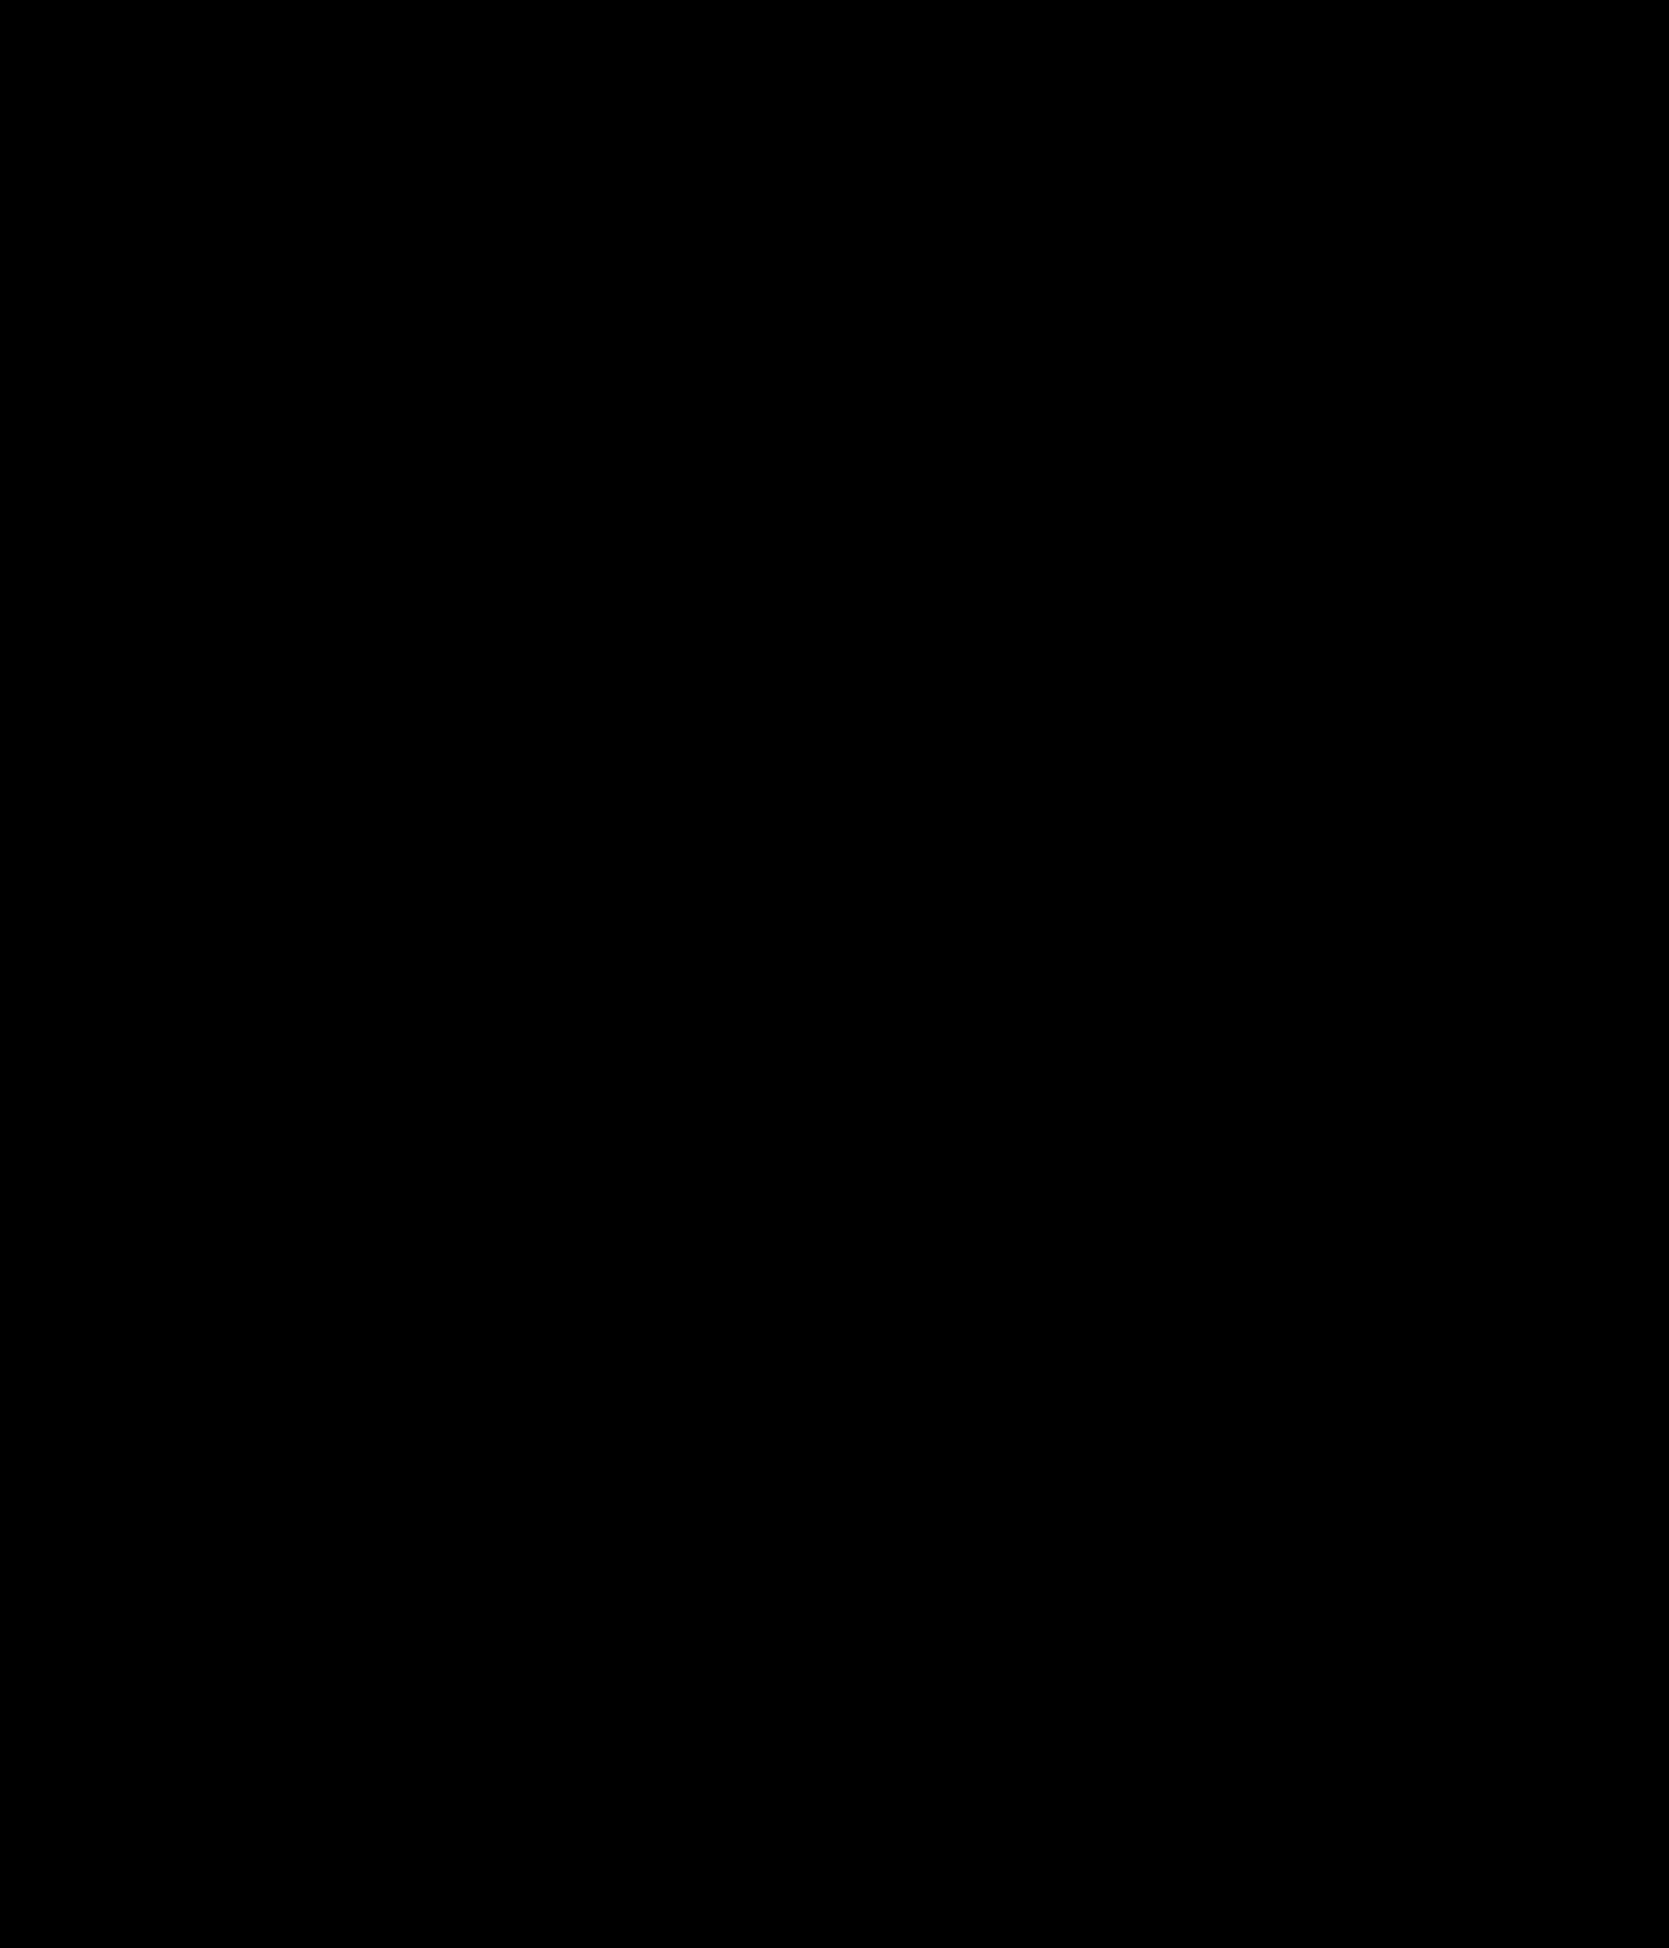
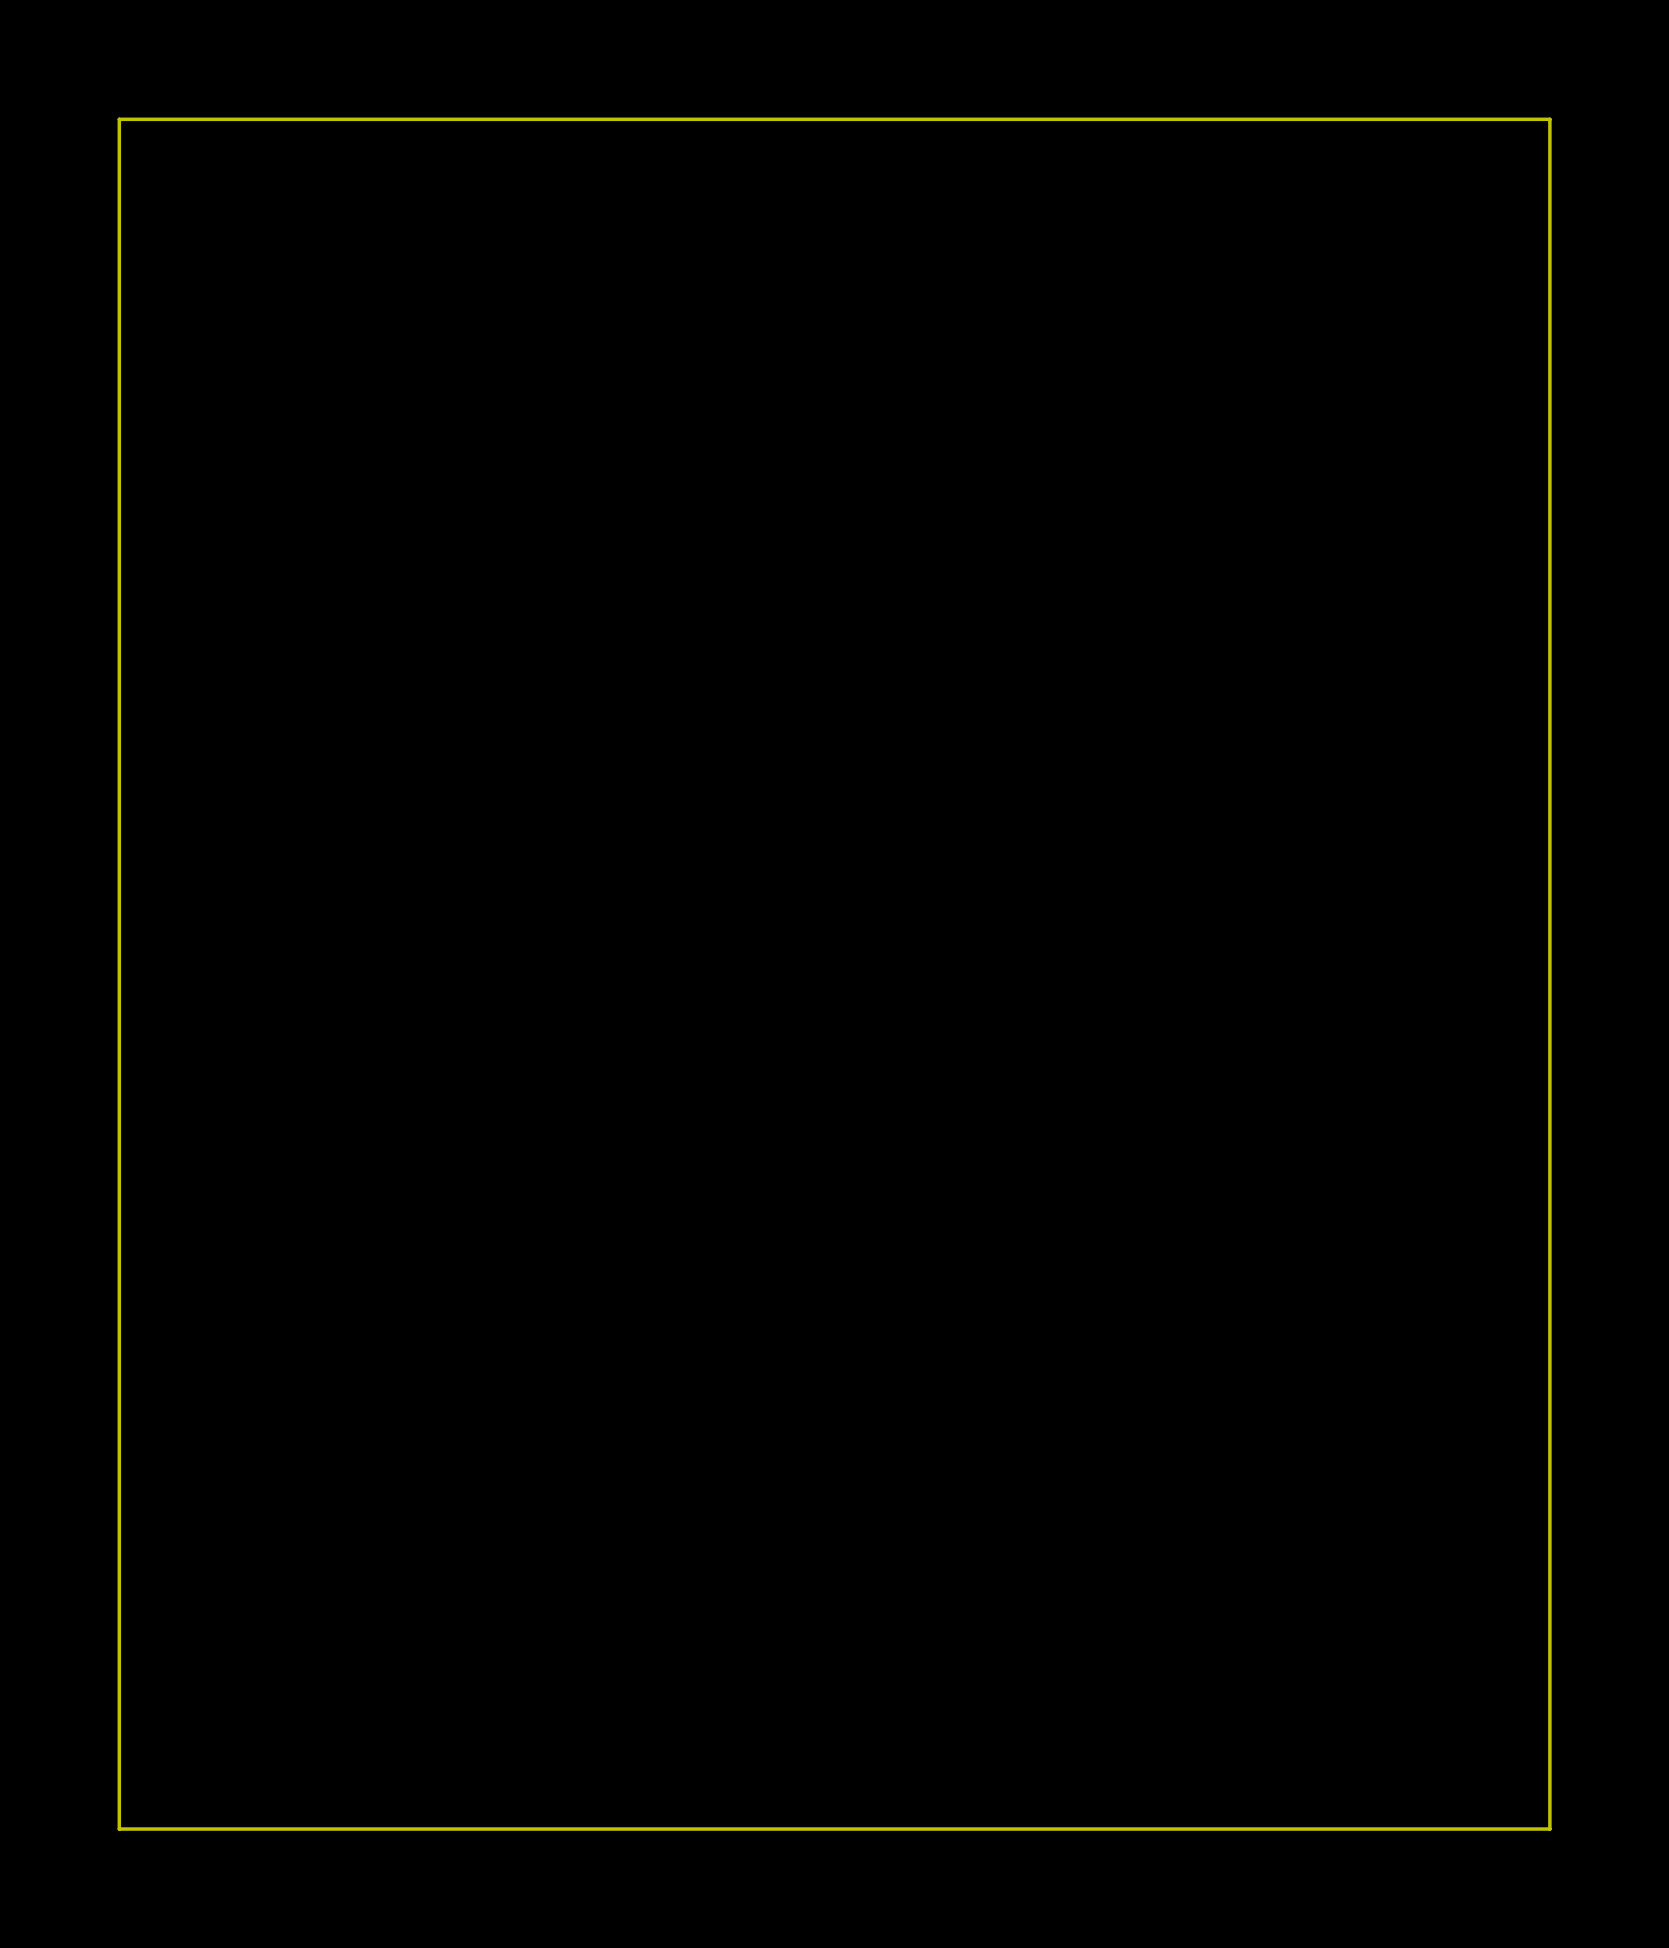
board edge: none -> (1549, 119) (119, 119) (119, 1829) (1549, 1829) (1549, 119)

